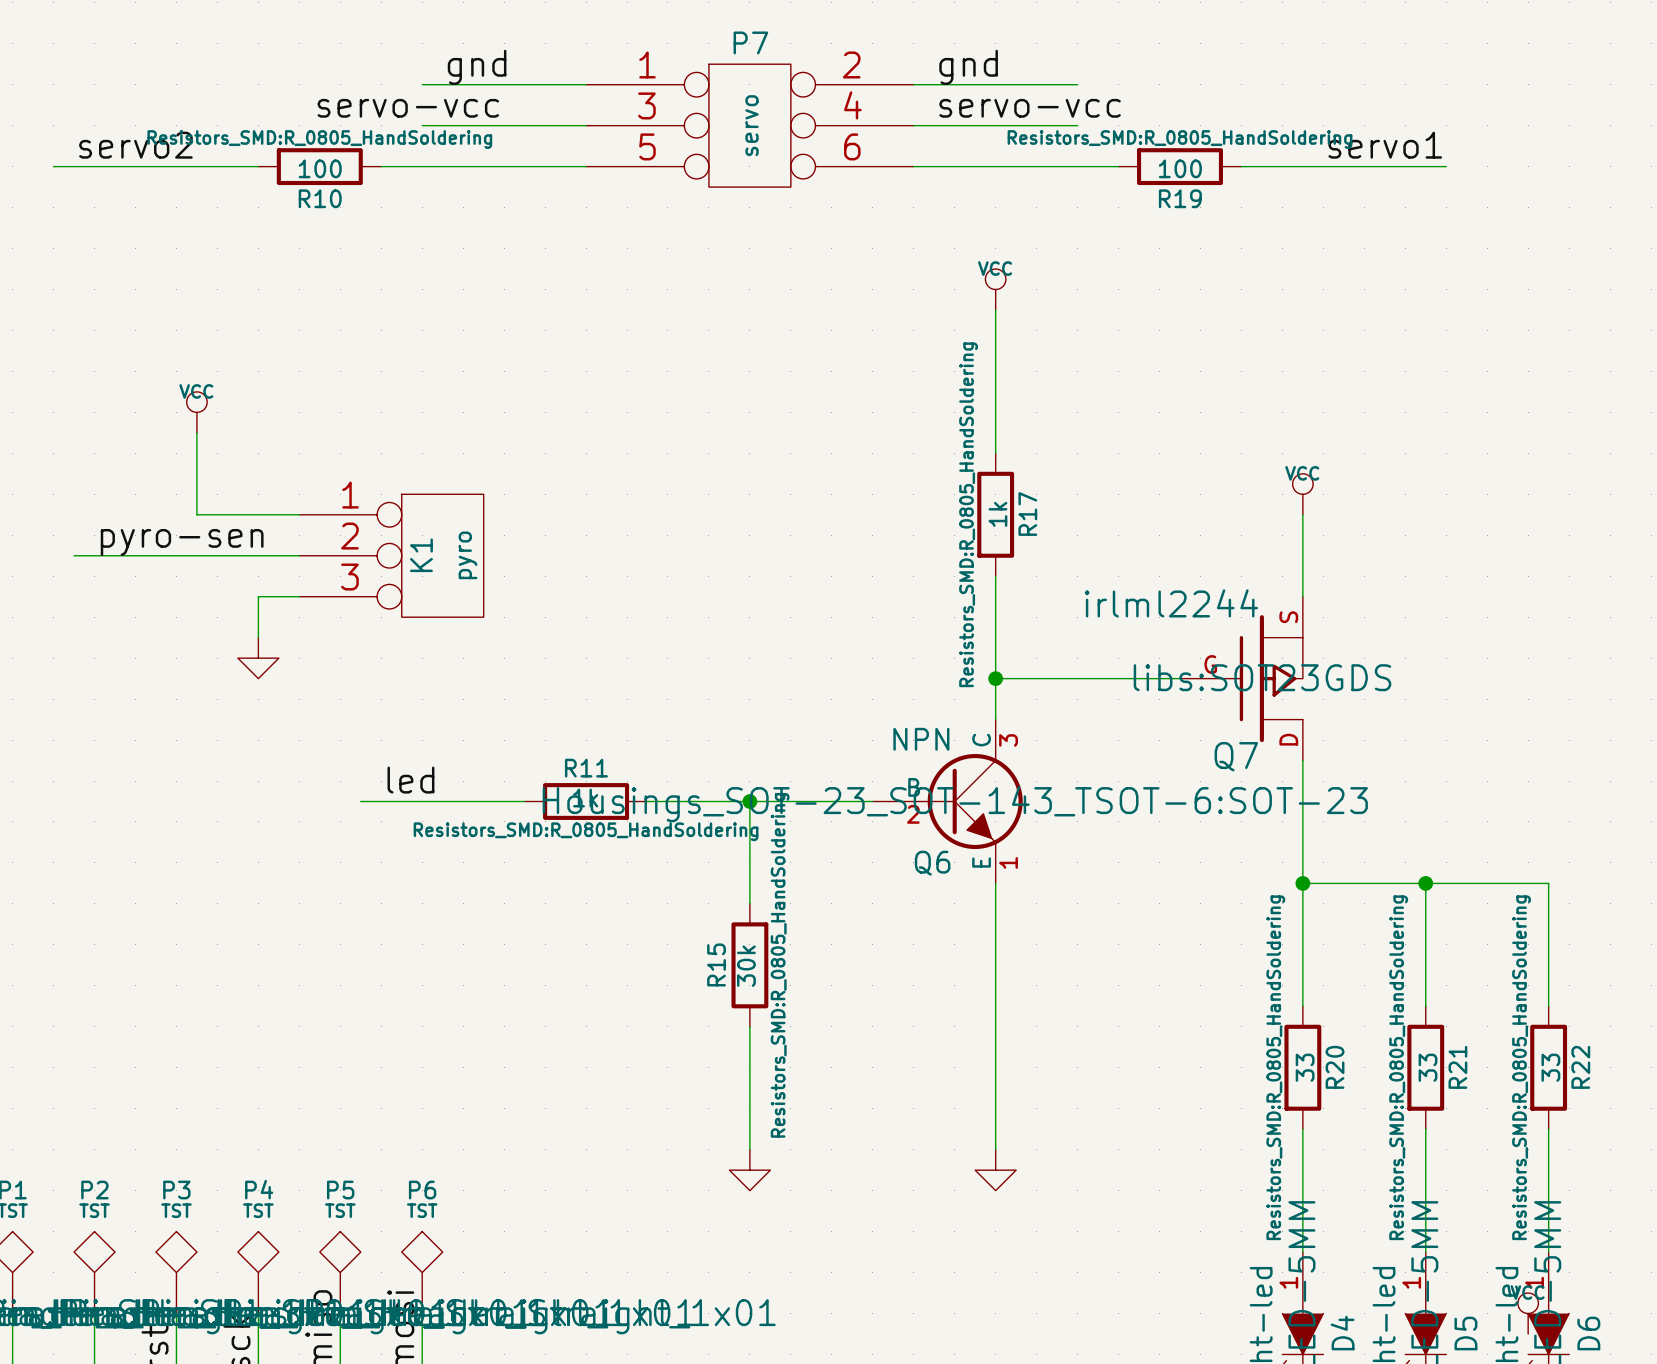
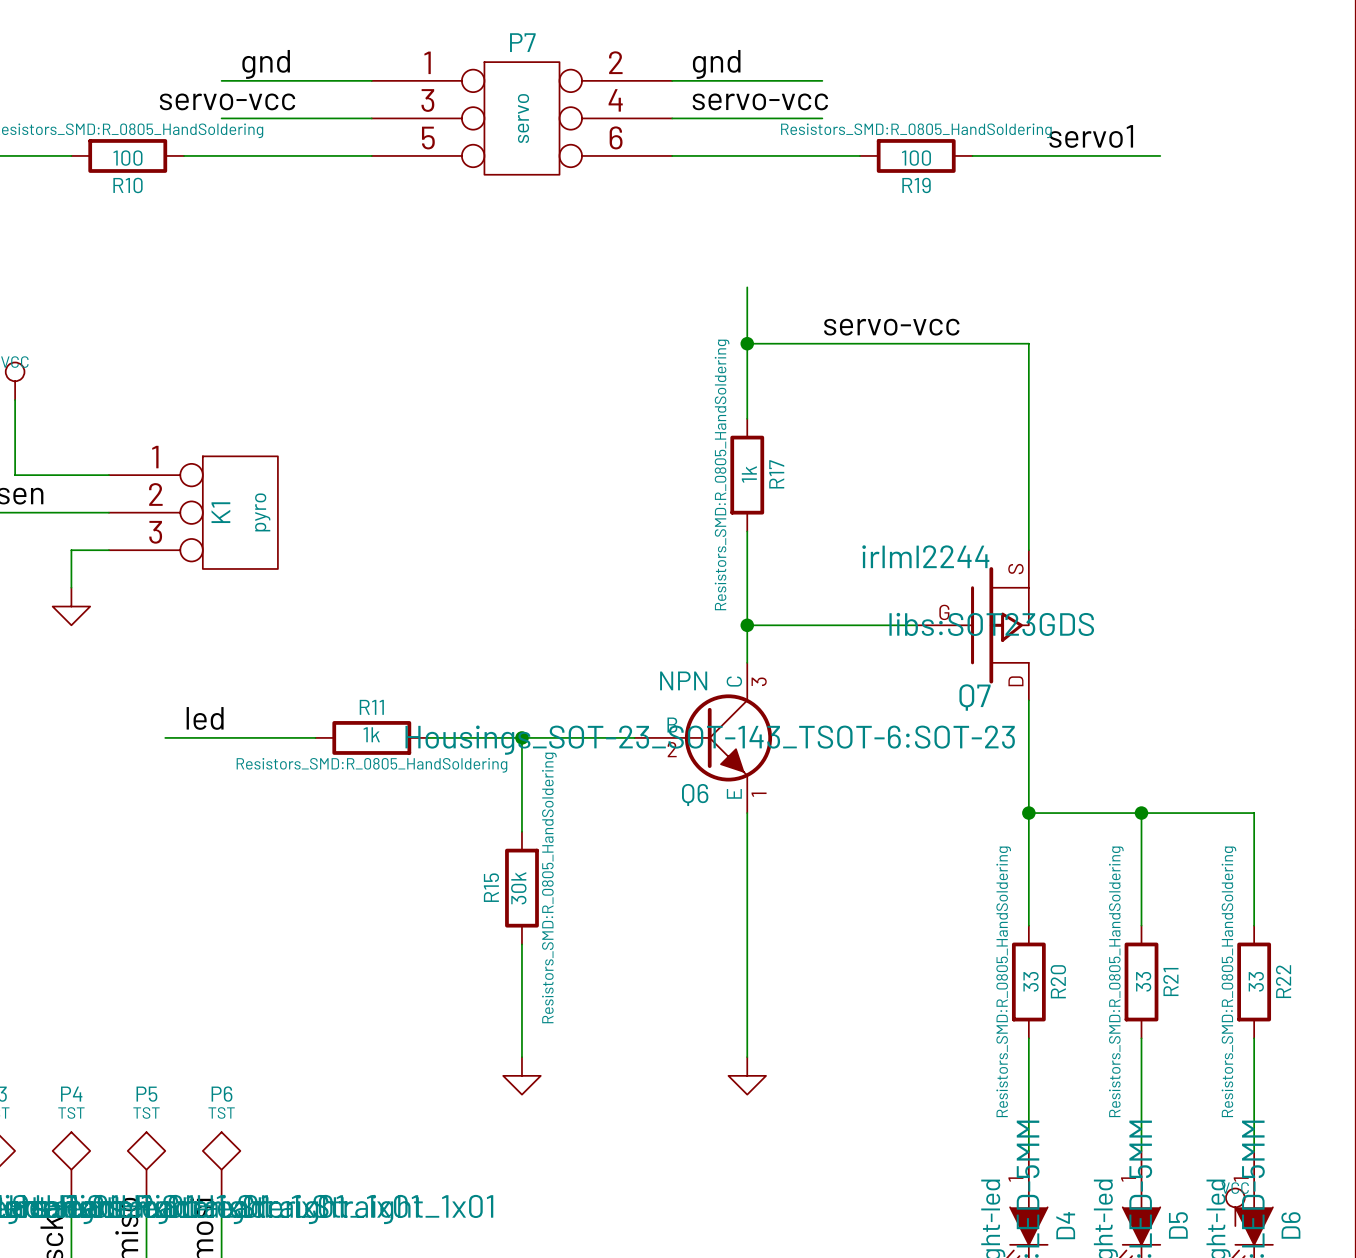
power symbol: VCC (995, 289) -> none
label: none -> servo-vcc (891, 327)
wire: none -> (747, 343) (1028, 343) (1028, 475)
junction: none -> (747, 343)
power symbol: VCC (1302, 494) -> none

